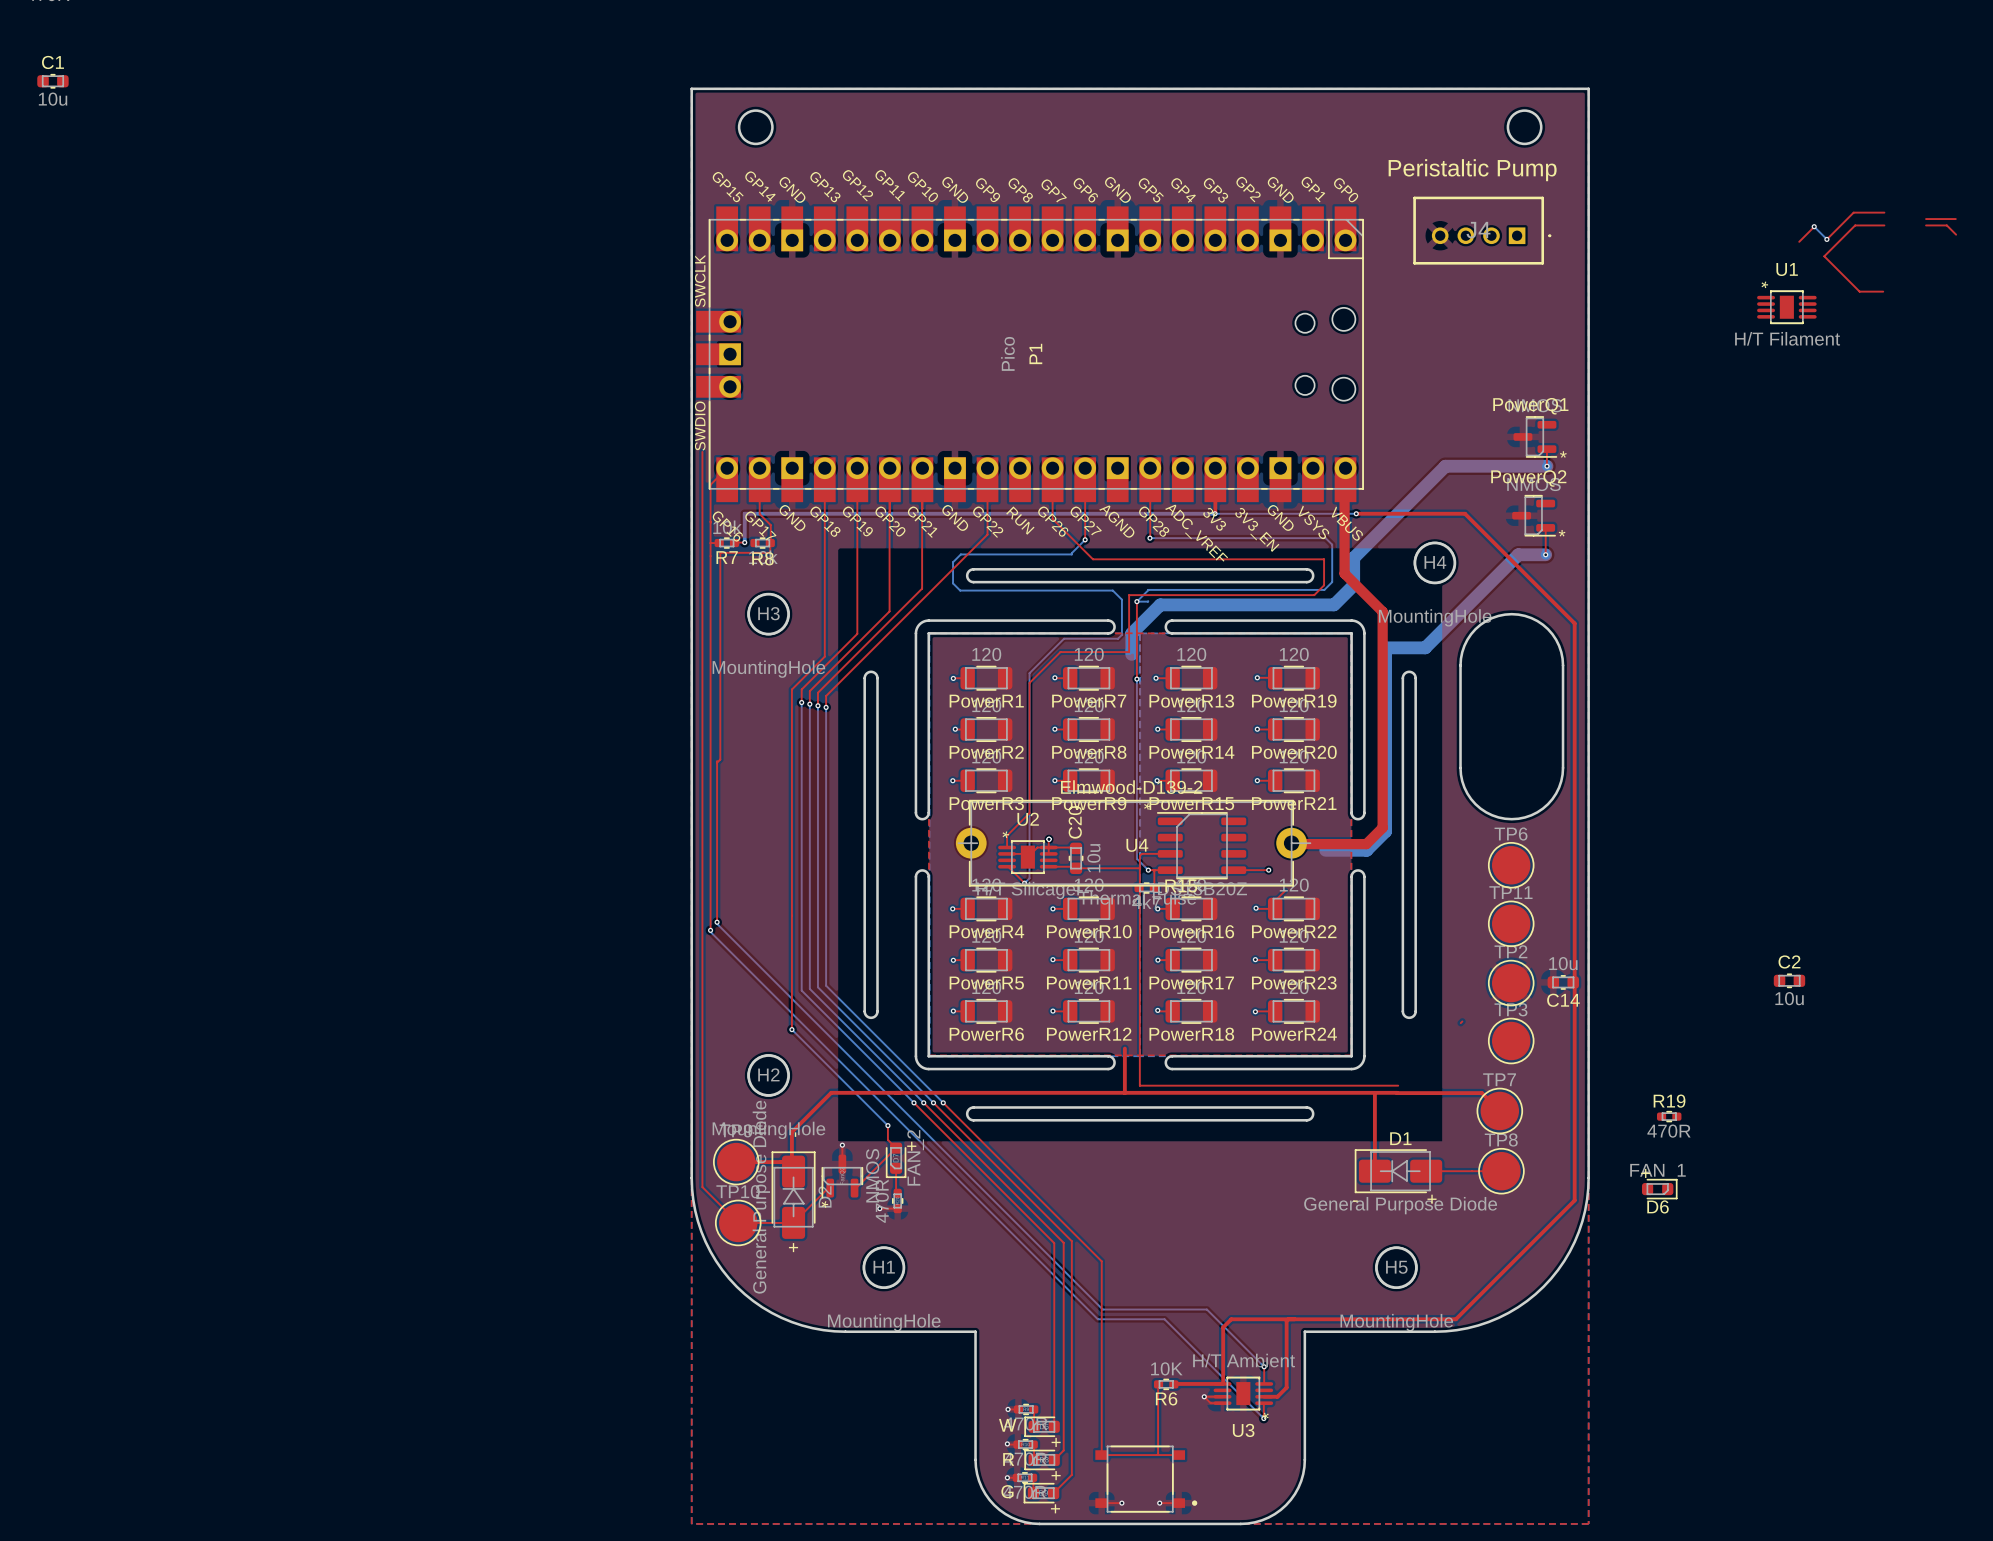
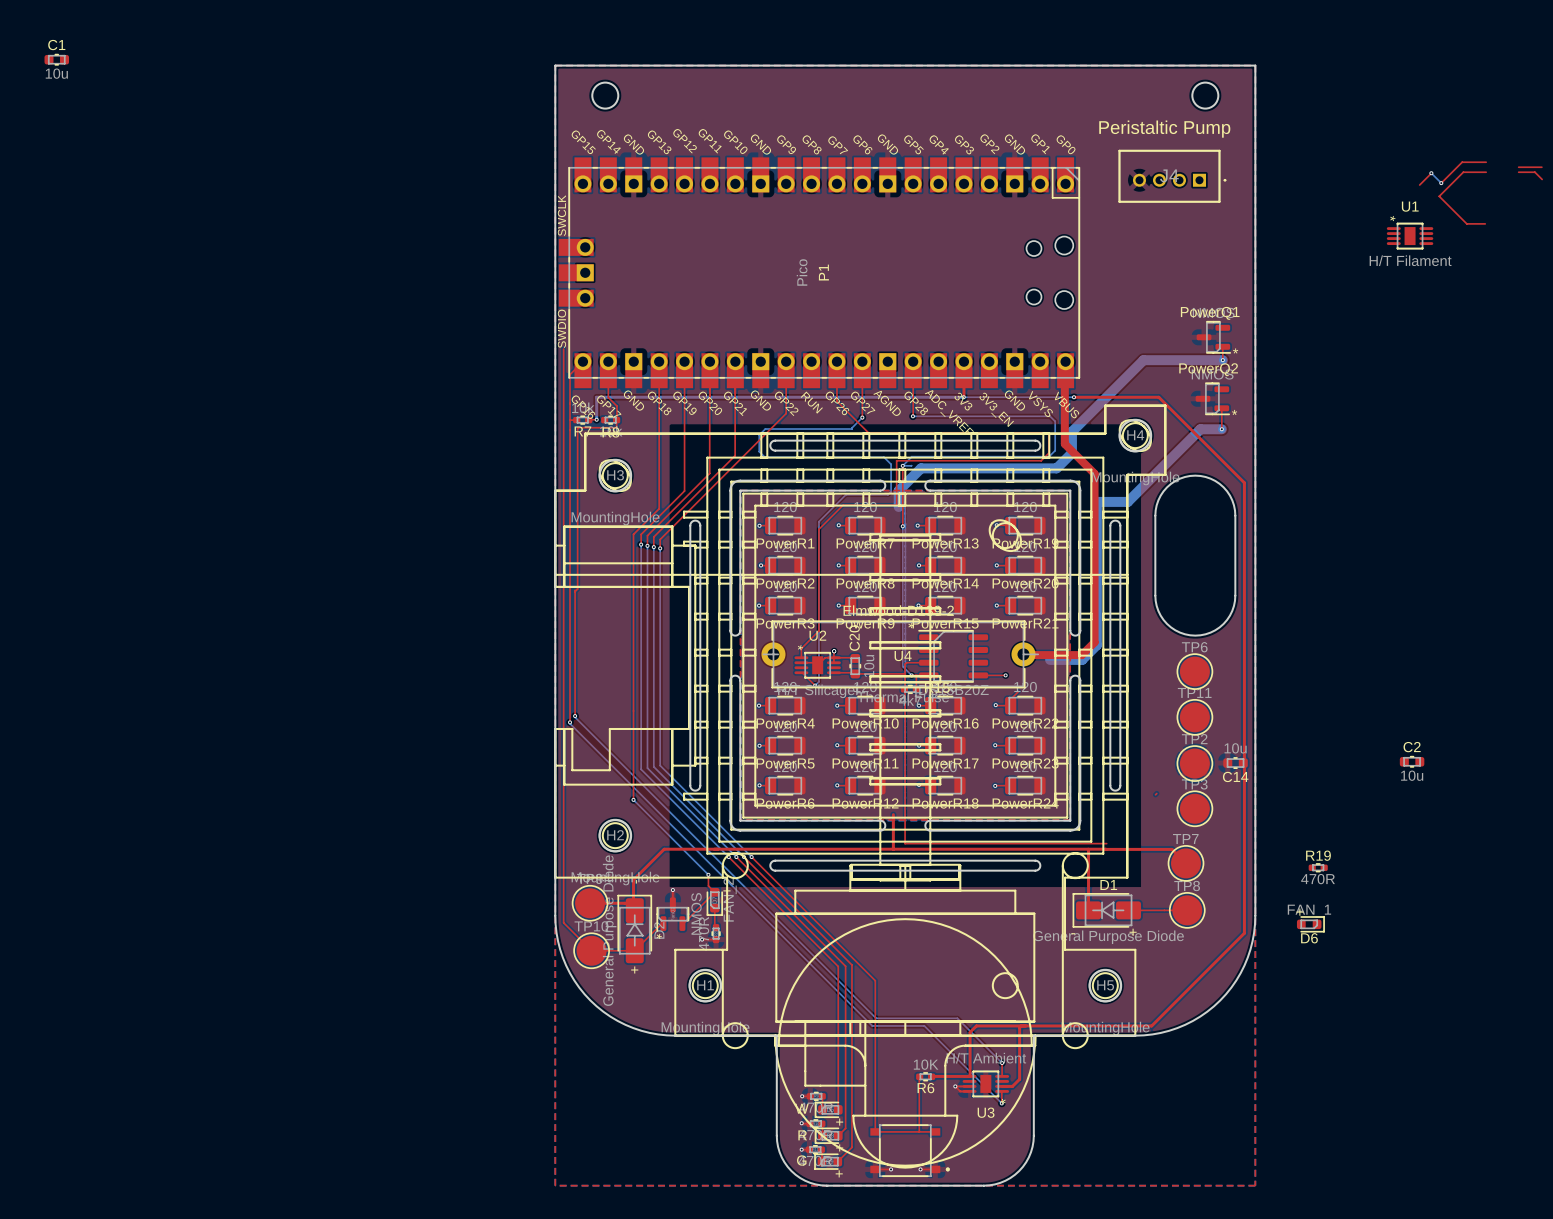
drawing: none -> [554, 404, 1167, 1169]

